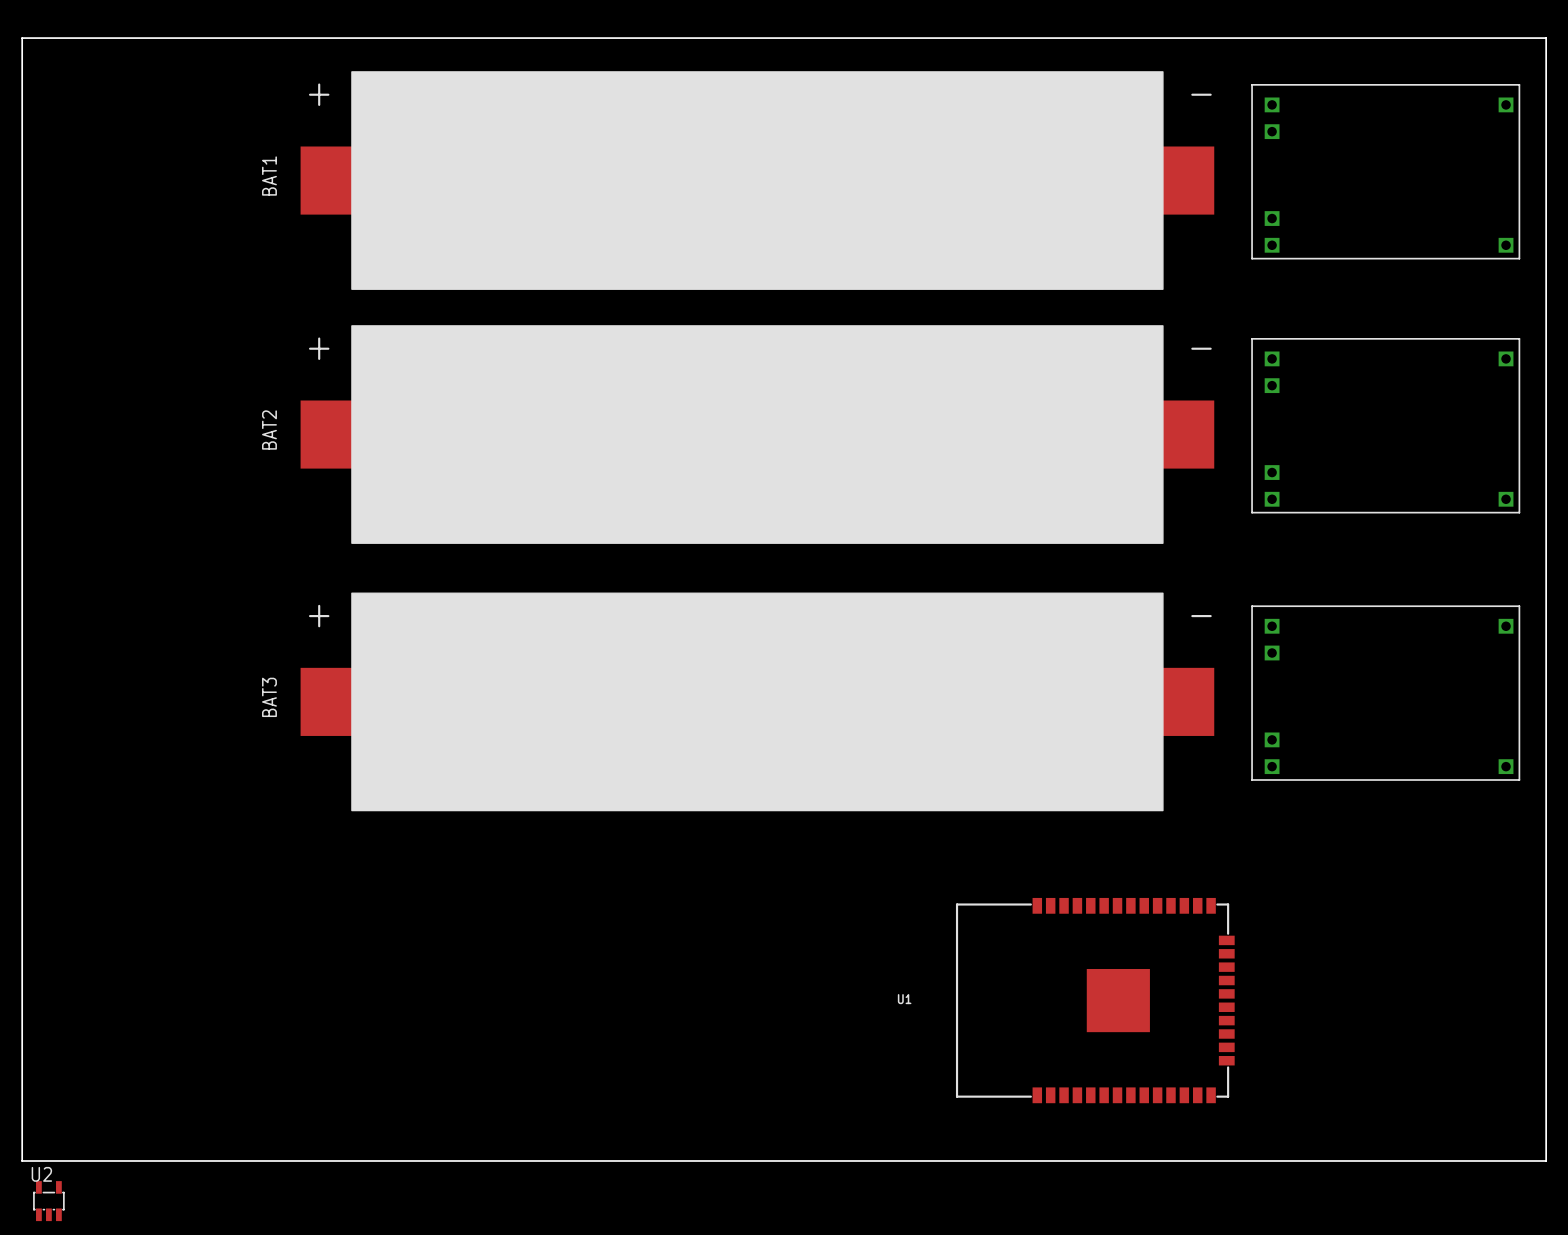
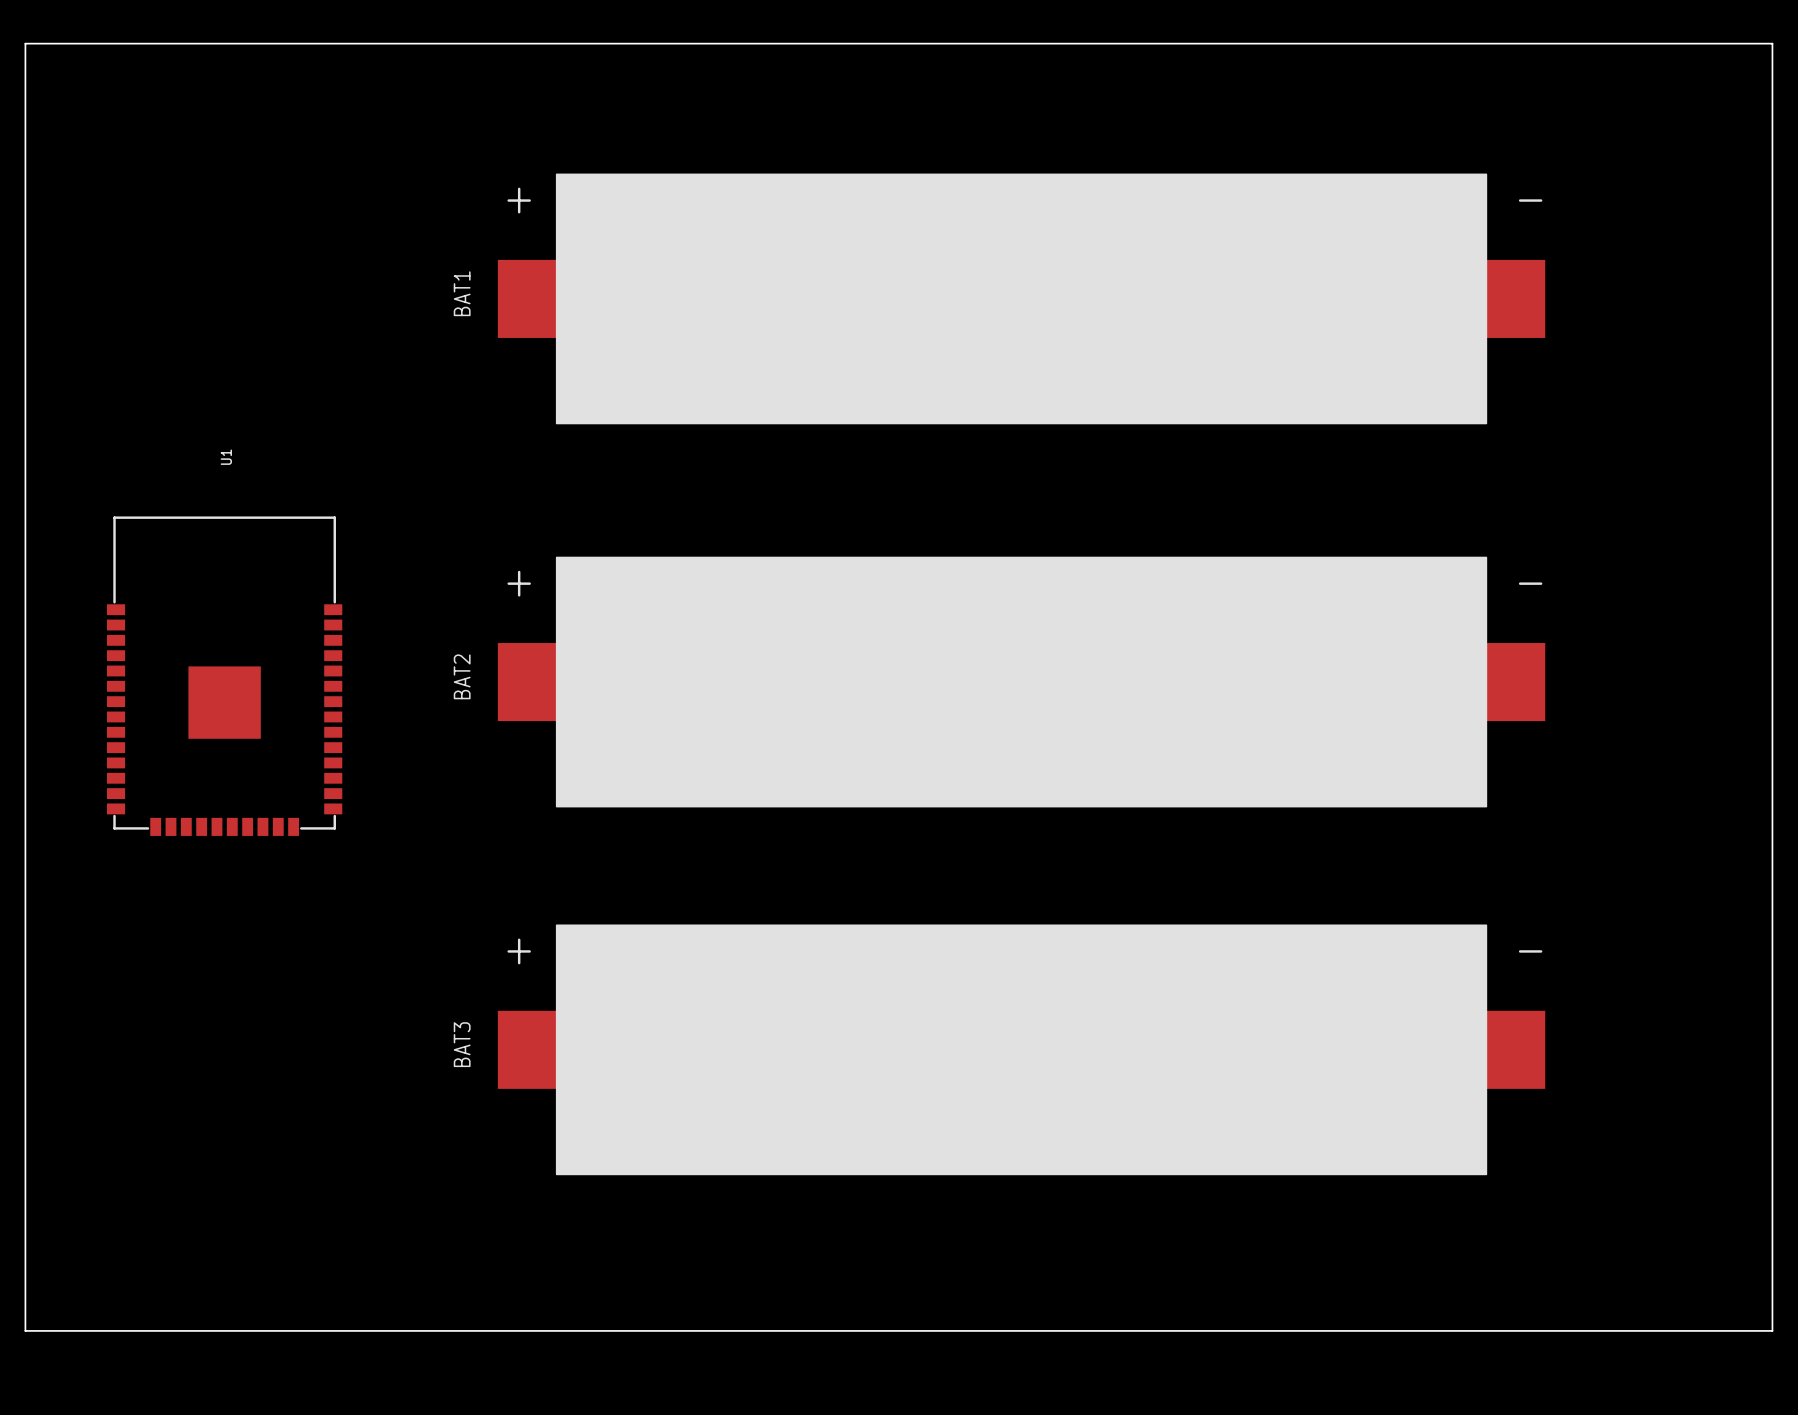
part: (1385, 171) -> none
BAT1 position: (757, 180) -> (1021, 298)
part: (1385, 425) -> none
BAT2 position: (757, 434) -> (1021, 682)
part: (1385, 693) -> none
BAT3 position: (757, 701) -> (1021, 1049)
U1 rotation: 0° (1095, 1000) -> 90° clockwise (224, 676)
U1 position: (1095, 1000) -> (224, 676)
U2: (48, 1201) -> none

